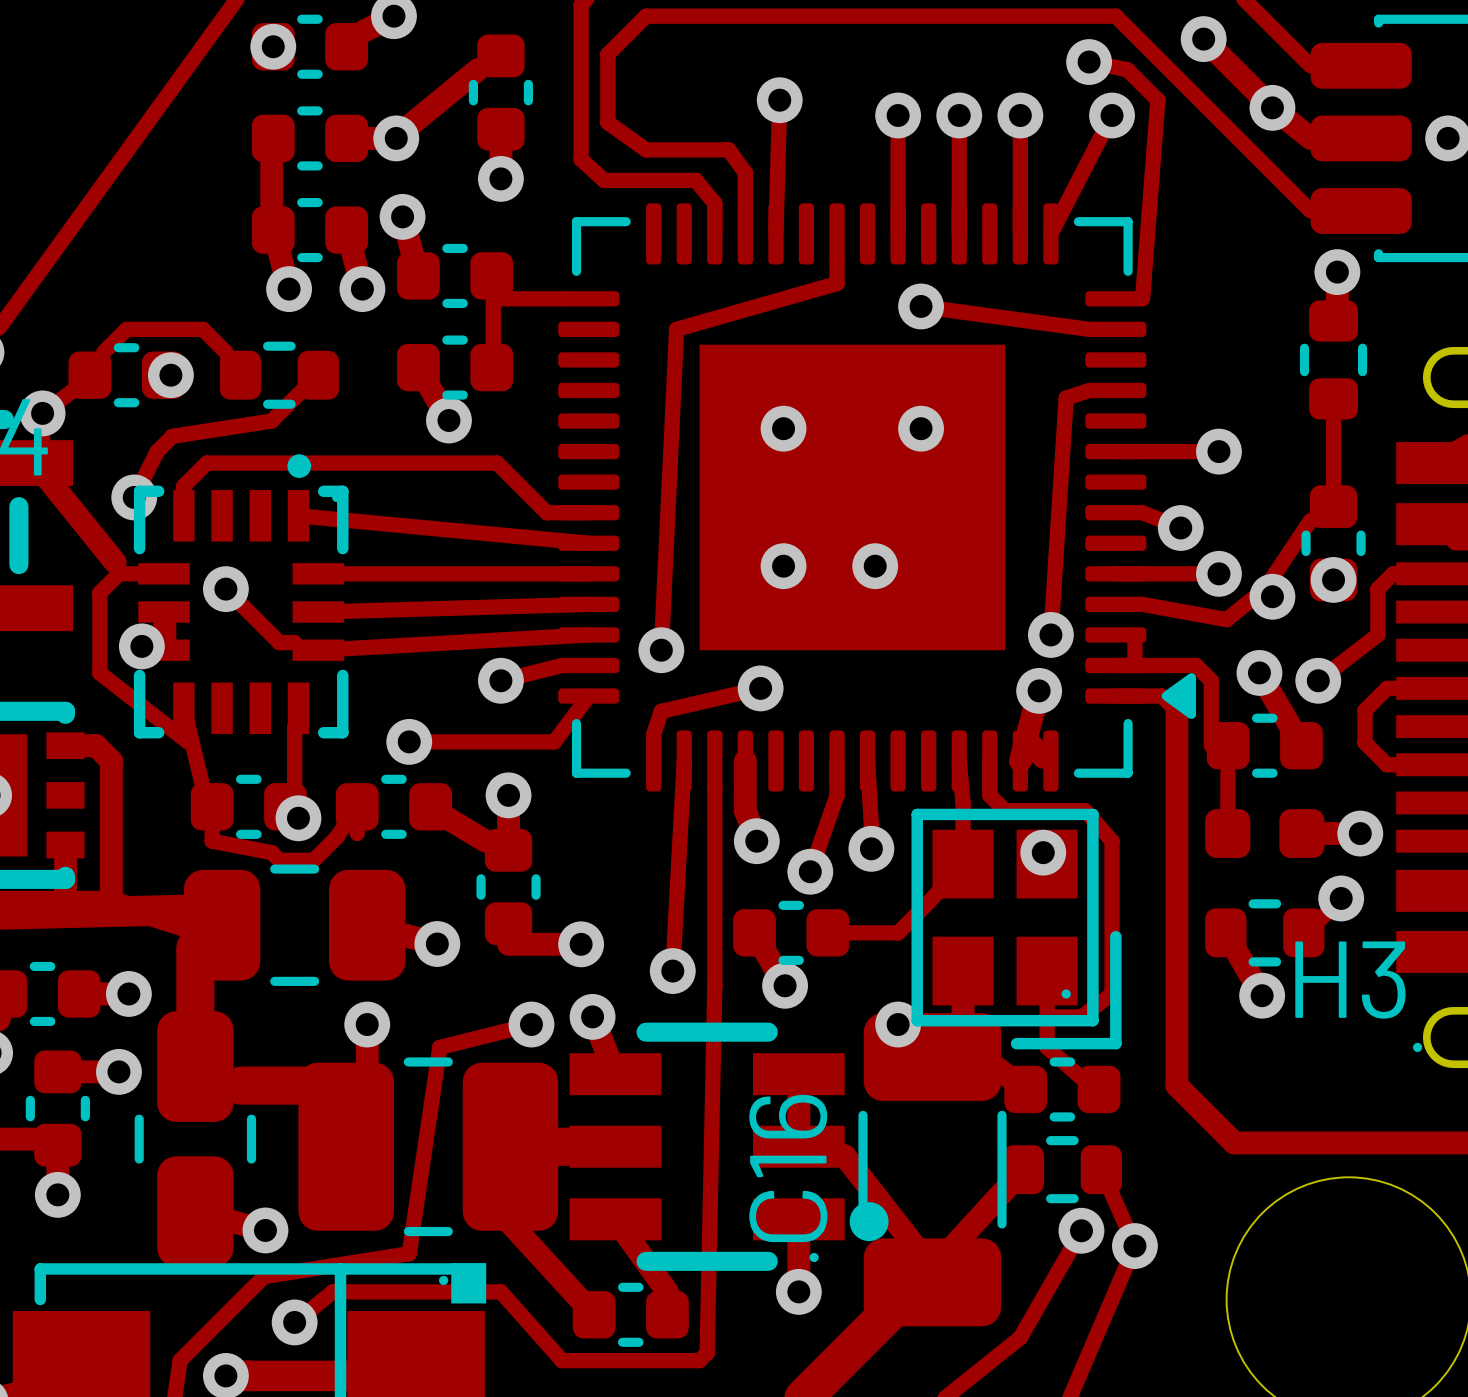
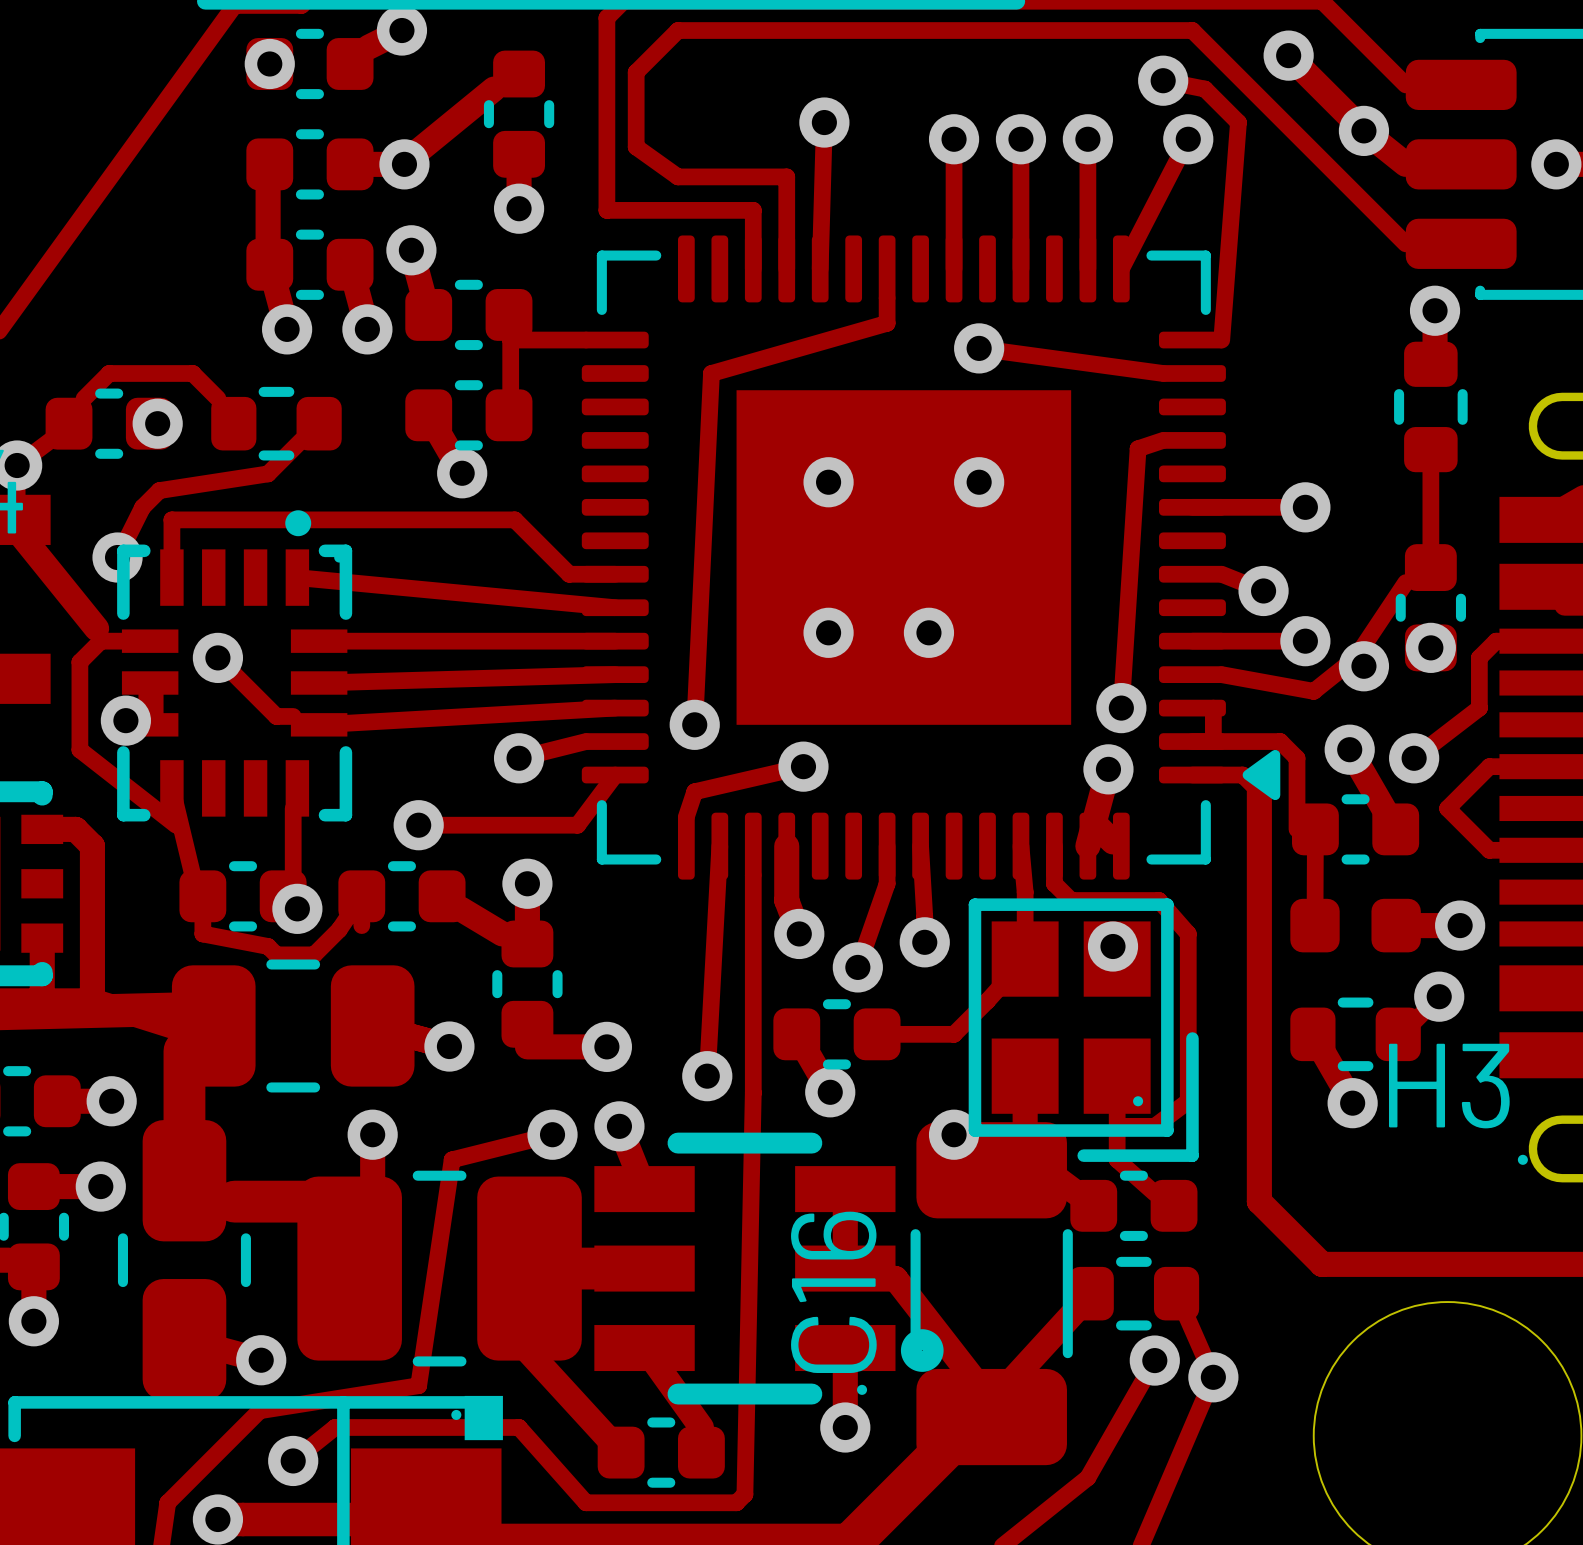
track: (728, 149) (745, 172) -> (768, 176) (786, 176) (786, 202)
track: (581, 159) (604, 180) -> (606, 187) (606, 210) (631, 210)
track: (695, 180) (714, 203) -> (732, 210) (753, 210) (753, 235)
track: (206, 463) (183, 485) -> (197, 519) (171, 519) (171, 544)
track: (1365, 710) (1365, 742) -> (1465, 790) (1447, 808) (1465, 826)

